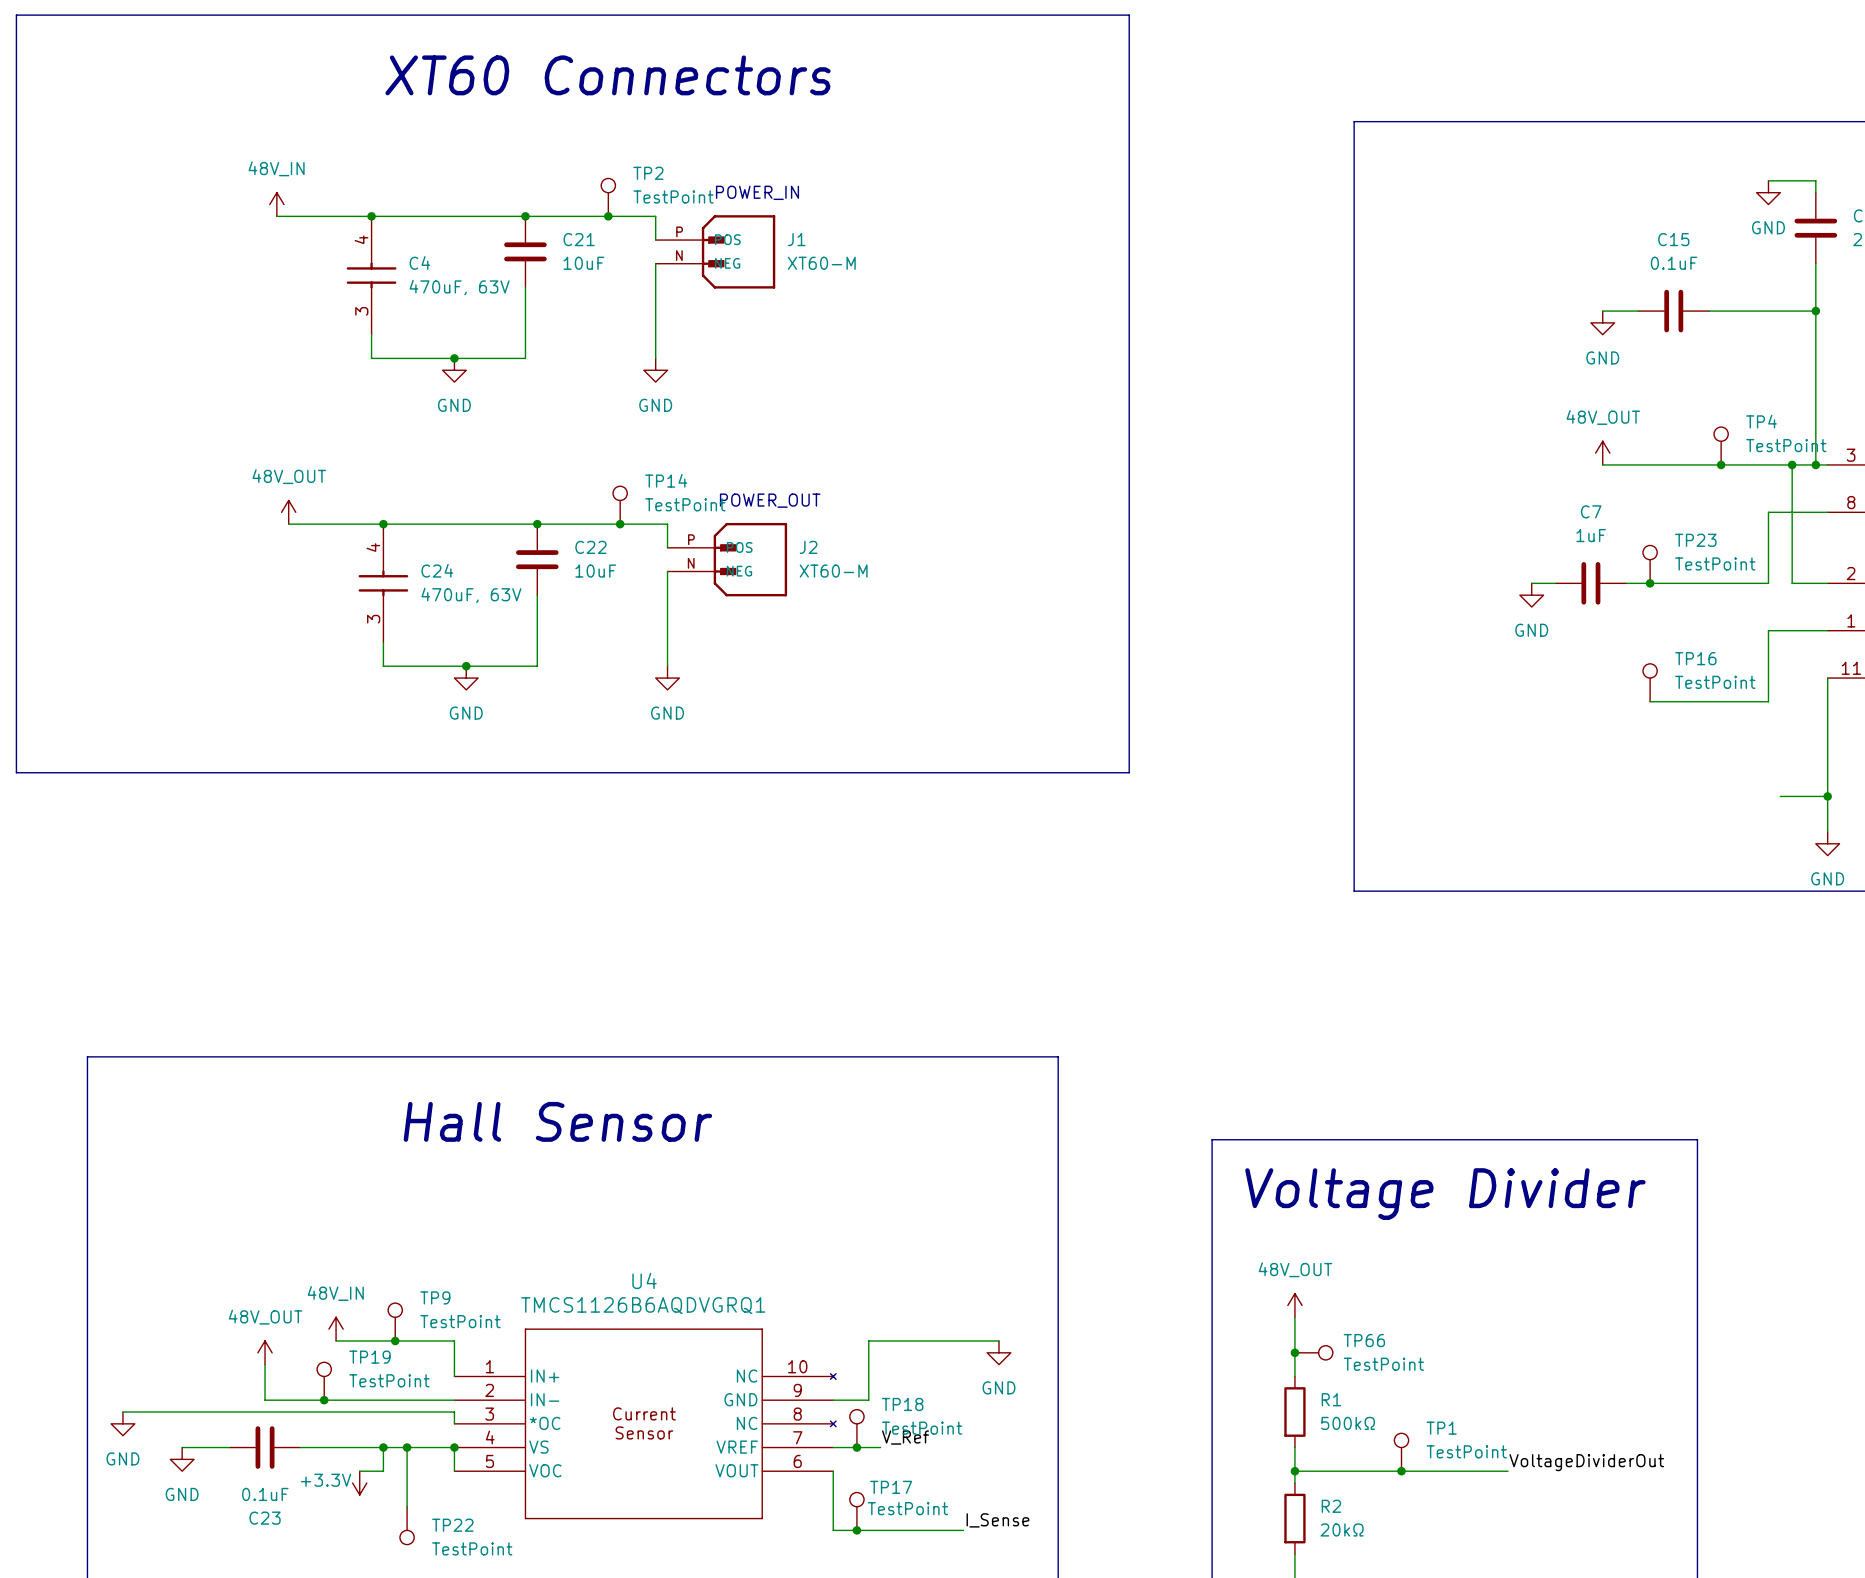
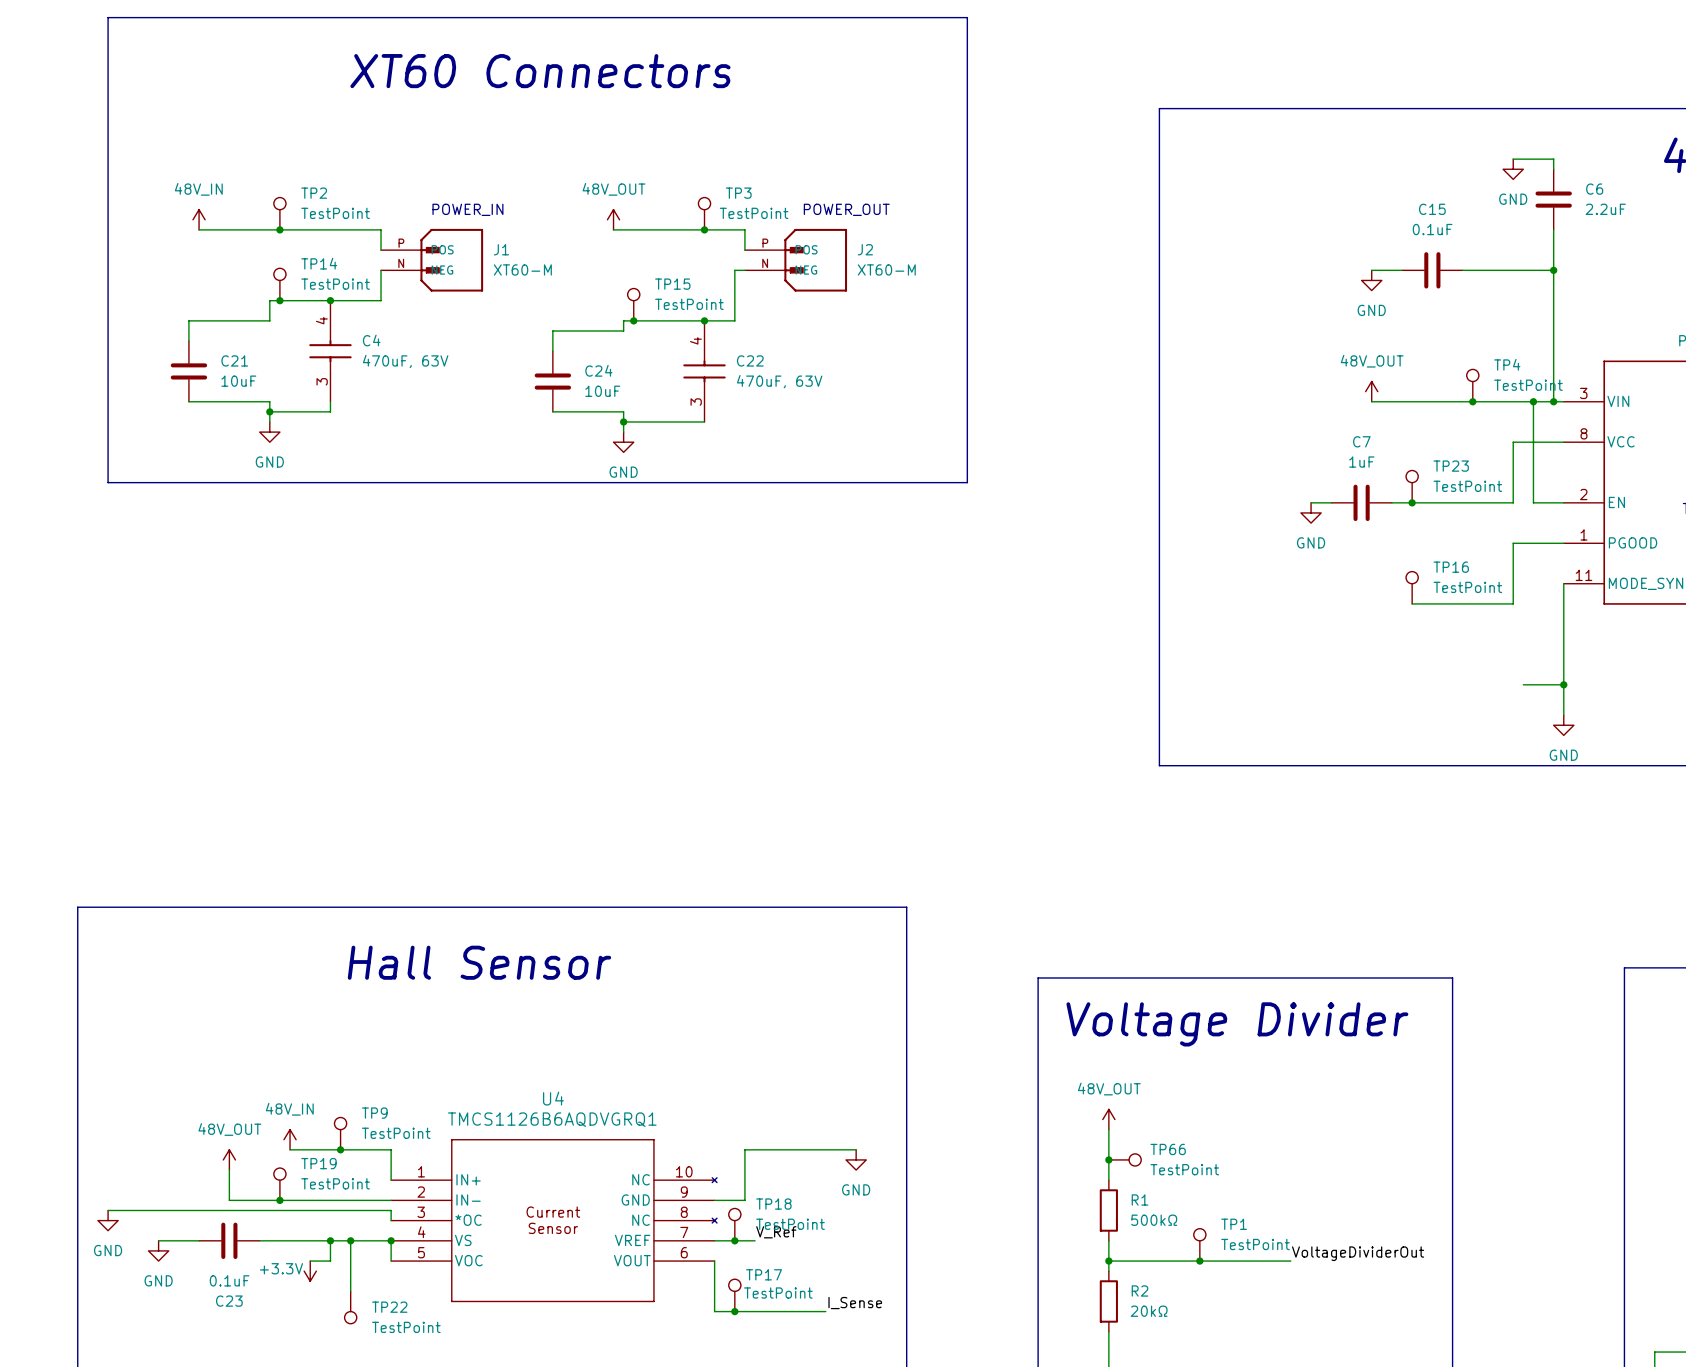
line: (122, 15) (16, 15) (16, 772) (1129, 772) (1129, 559) -> (108, 17) (108, 482) (967, 482)
text position: XT60 Connectors (608, 75) -> XT60 Connectors (540, 71)
text position: POWER_IN (757, 192) -> POWER_IN (467, 209)
TP2 position: (608, 197) -> (279, 213)
power symbol position: 48V_IN (276, 204) -> 48V_IN (199, 219)
wire: (276, 216) (655, 216) (655, 240) -> none
junction: (371, 216) -> none
junction: (525, 216) -> none
junction: (608, 216) -> none
text: none -> POWER_OUT (846, 209)
TP3: none -> TestPoint (704, 213)
C21 position: (525, 251) -> (188, 371)
power symbol: none -> 48V_OUT (613, 219)
J1 position: (715, 251) -> (432, 260)
wire: none -> (199, 229) (381, 229) (381, 250)
junction: none -> (279, 229)
wire: (655, 263) (655, 358) -> none
wire: none -> (613, 229) (744, 229) (744, 250)
junction: none -> (704, 229)
C4 position: (371, 275) -> (330, 351)
wire: (525, 287) (525, 358) (371, 358) (371, 334) -> none
wire: none -> (381, 270) (381, 300) (269, 300) (269, 320) (188, 320) (188, 341)
wire: none -> (744, 270) (734, 270) (734, 320) (623, 320) (623, 331) (552, 331) (552, 351)
junction: none -> (279, 300)
junction: none -> (330, 300)
TP15: none -> TestPoint (633, 304)
junction: (454, 358) -> none
power symbol: GND (454, 370) -> none
power symbol: GND (655, 370) -> none
junction: none -> (633, 320)
junction: none -> (704, 320)
wire: none -> (188, 401) (269, 401) (269, 421)
wire: none -> (330, 401) (330, 411) (269, 411)
junction: none -> (269, 411)
wire: none -> (552, 411) (623, 411) (623, 432)
wire: none -> (623, 421) (704, 421)
junction: none -> (623, 421)
power symbol: none -> GND (269, 432)
text: POWER_OUT (770, 500) -> none
TP14 position: (620, 505) -> (279, 284)
power symbol: 48V_OUT (288, 512) -> none
power symbol: none -> GND (623, 442)
wire: (288, 524) (667, 524) (667, 547) -> none
C24 symbol: [358, 524, 409, 643] -> [534, 351, 572, 412]
junction: (383, 524) -> none
C22 symbol: [515, 524, 559, 596] -> [683, 320, 726, 422]
junction: (537, 524) -> none
junction: (620, 524) -> none
J2 position: (727, 559) -> (795, 260)
C22 value: 10uF (595, 571) -> 470uF, 63V (779, 381)
wire: (667, 571) (667, 666) -> none
C24 value: 470uF, 63V (471, 595) -> 10uF (602, 391)
wire: (537, 595) (537, 666) (383, 666) (383, 642) -> none
junction: (466, 666) -> none
power symbol: GND (466, 678) -> none
power symbol: GND (667, 678) -> none

